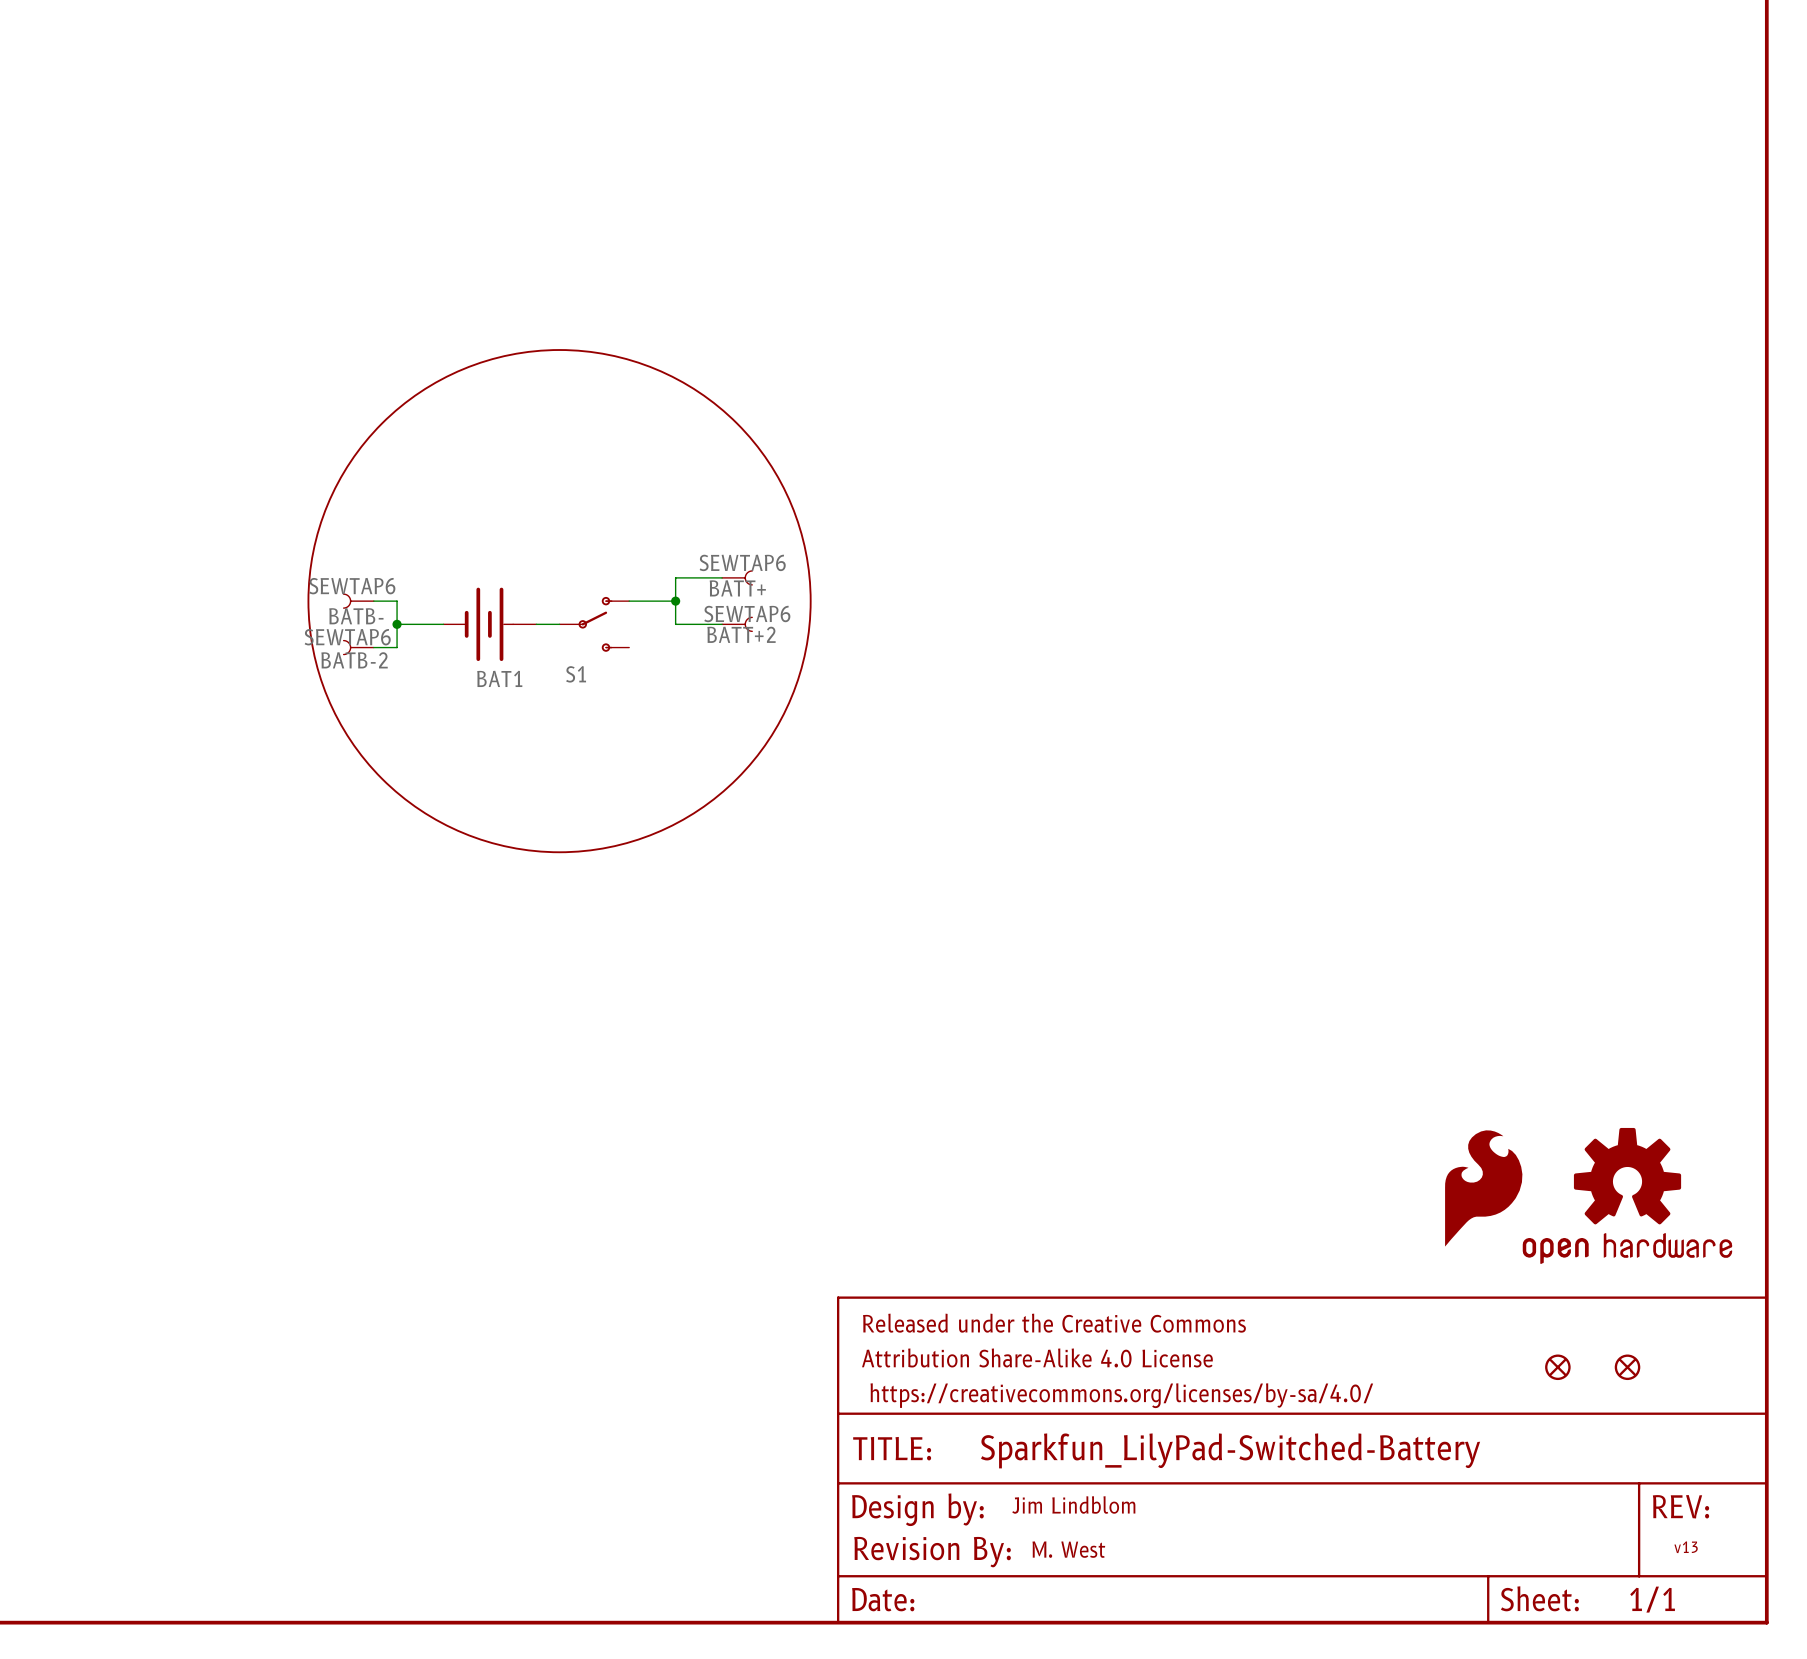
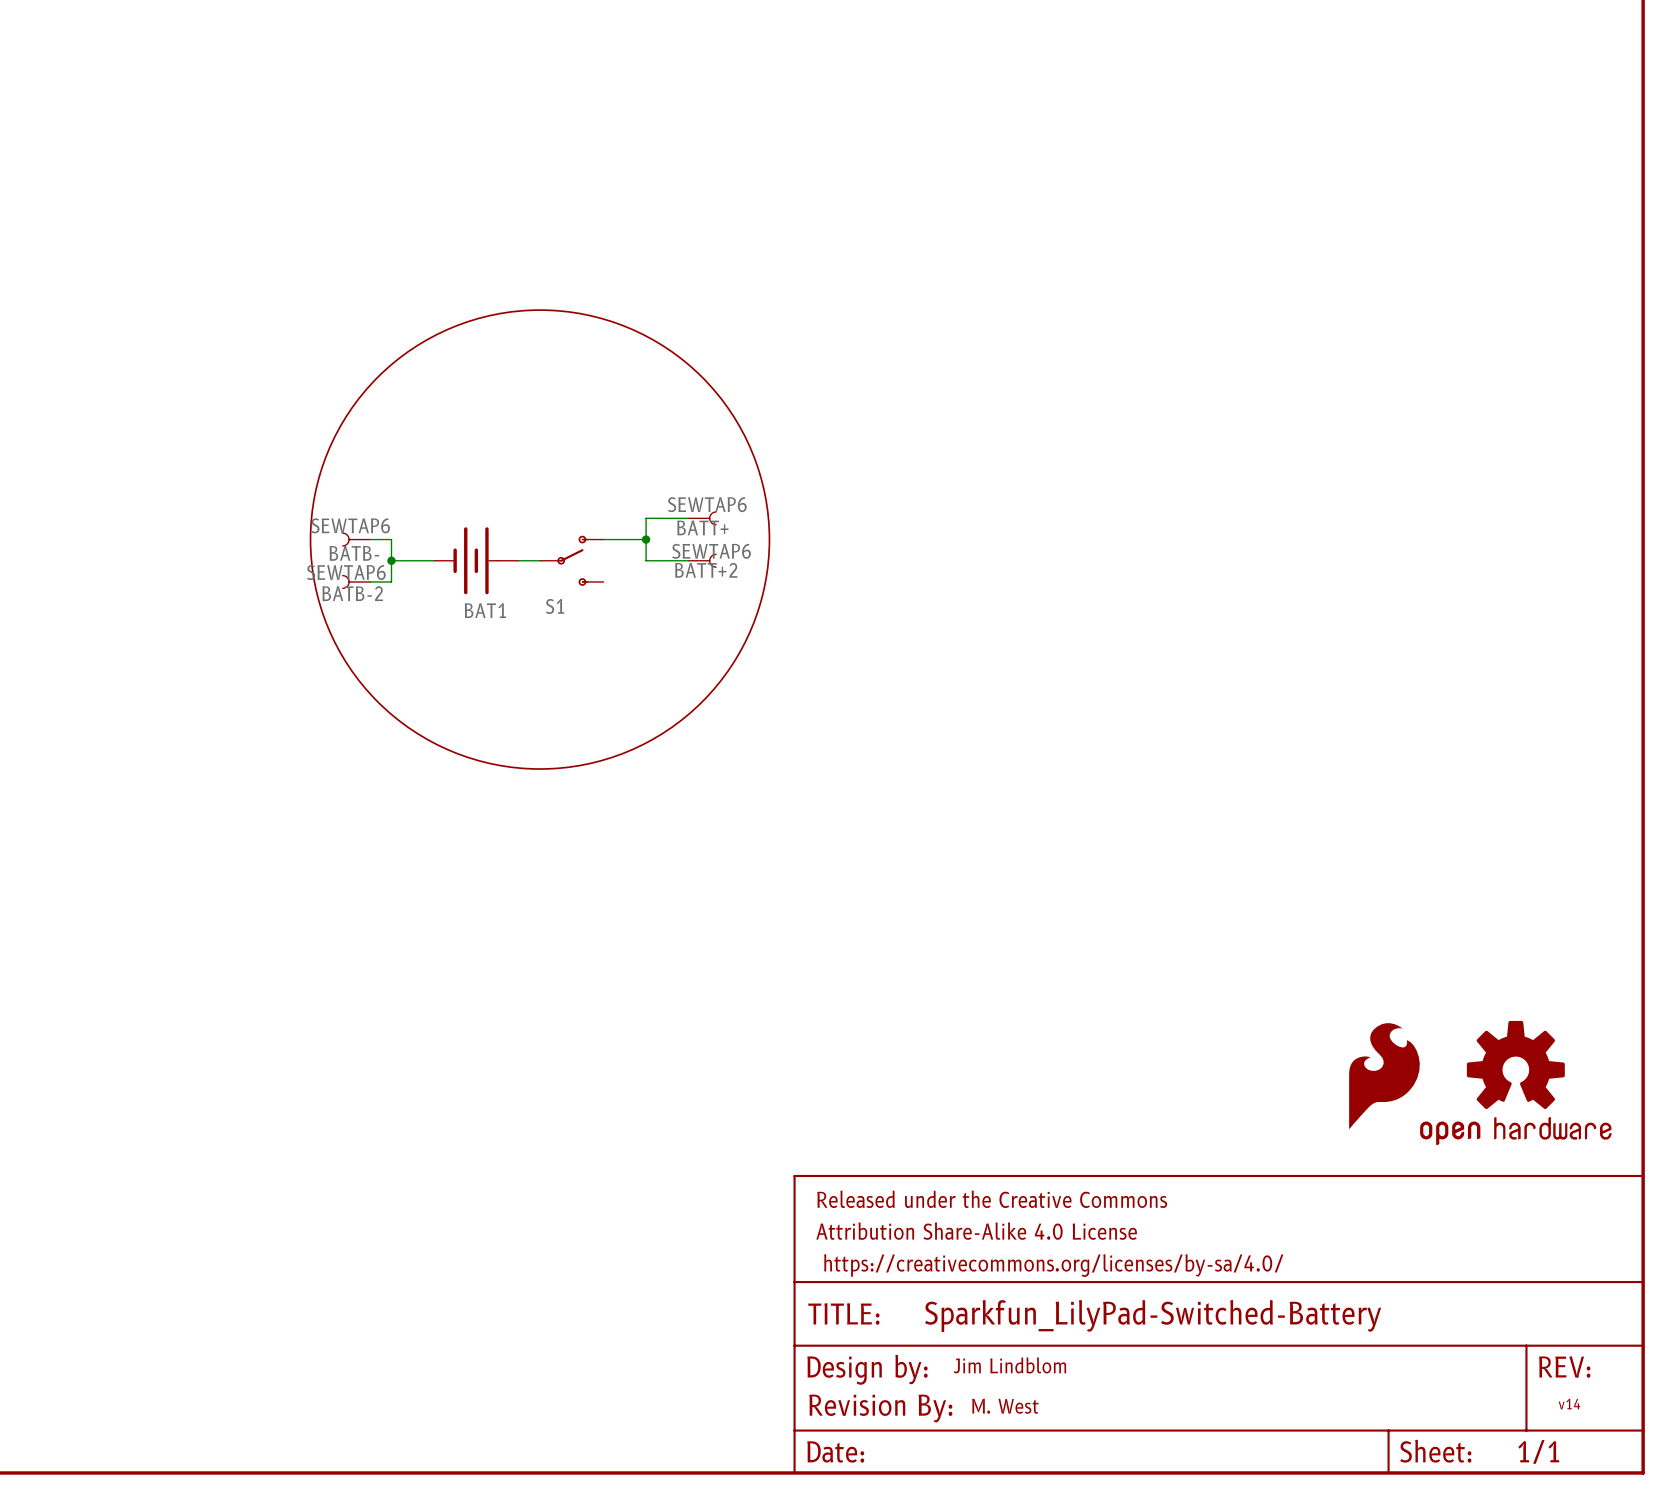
part: (1557, 1367) -> none
part: (1627, 1367) -> none
text: v13 (1686, 1547) -> v14 (1569, 1404)

